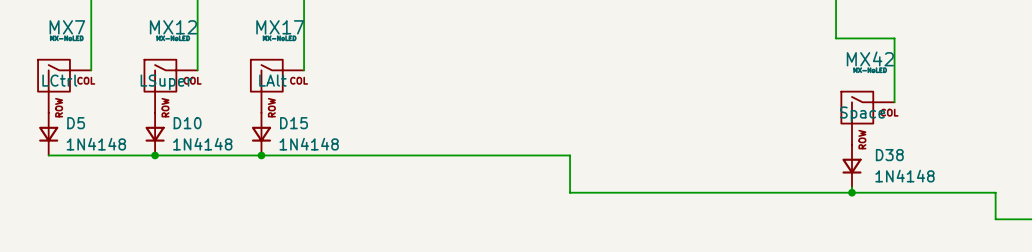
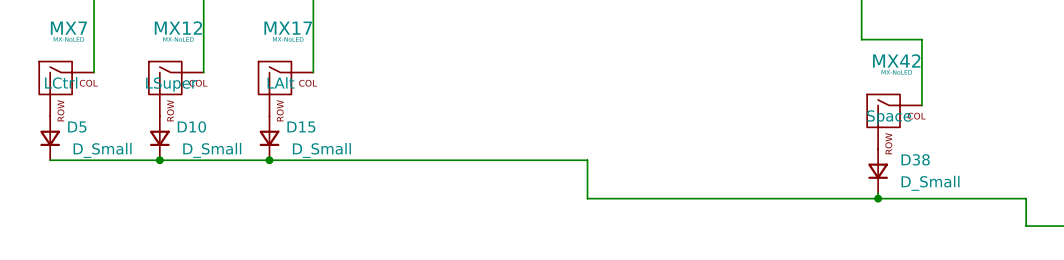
D5 value: 1N4148 (96, 144) -> D_Small (102, 150)
D10 value: 1N4148 (202, 144) -> D_Small (212, 150)
D15 value: 1N4148 (309, 144) -> D_Small (321, 150)
D38 value: 1N4148 (905, 176) -> D_Small (930, 183)

